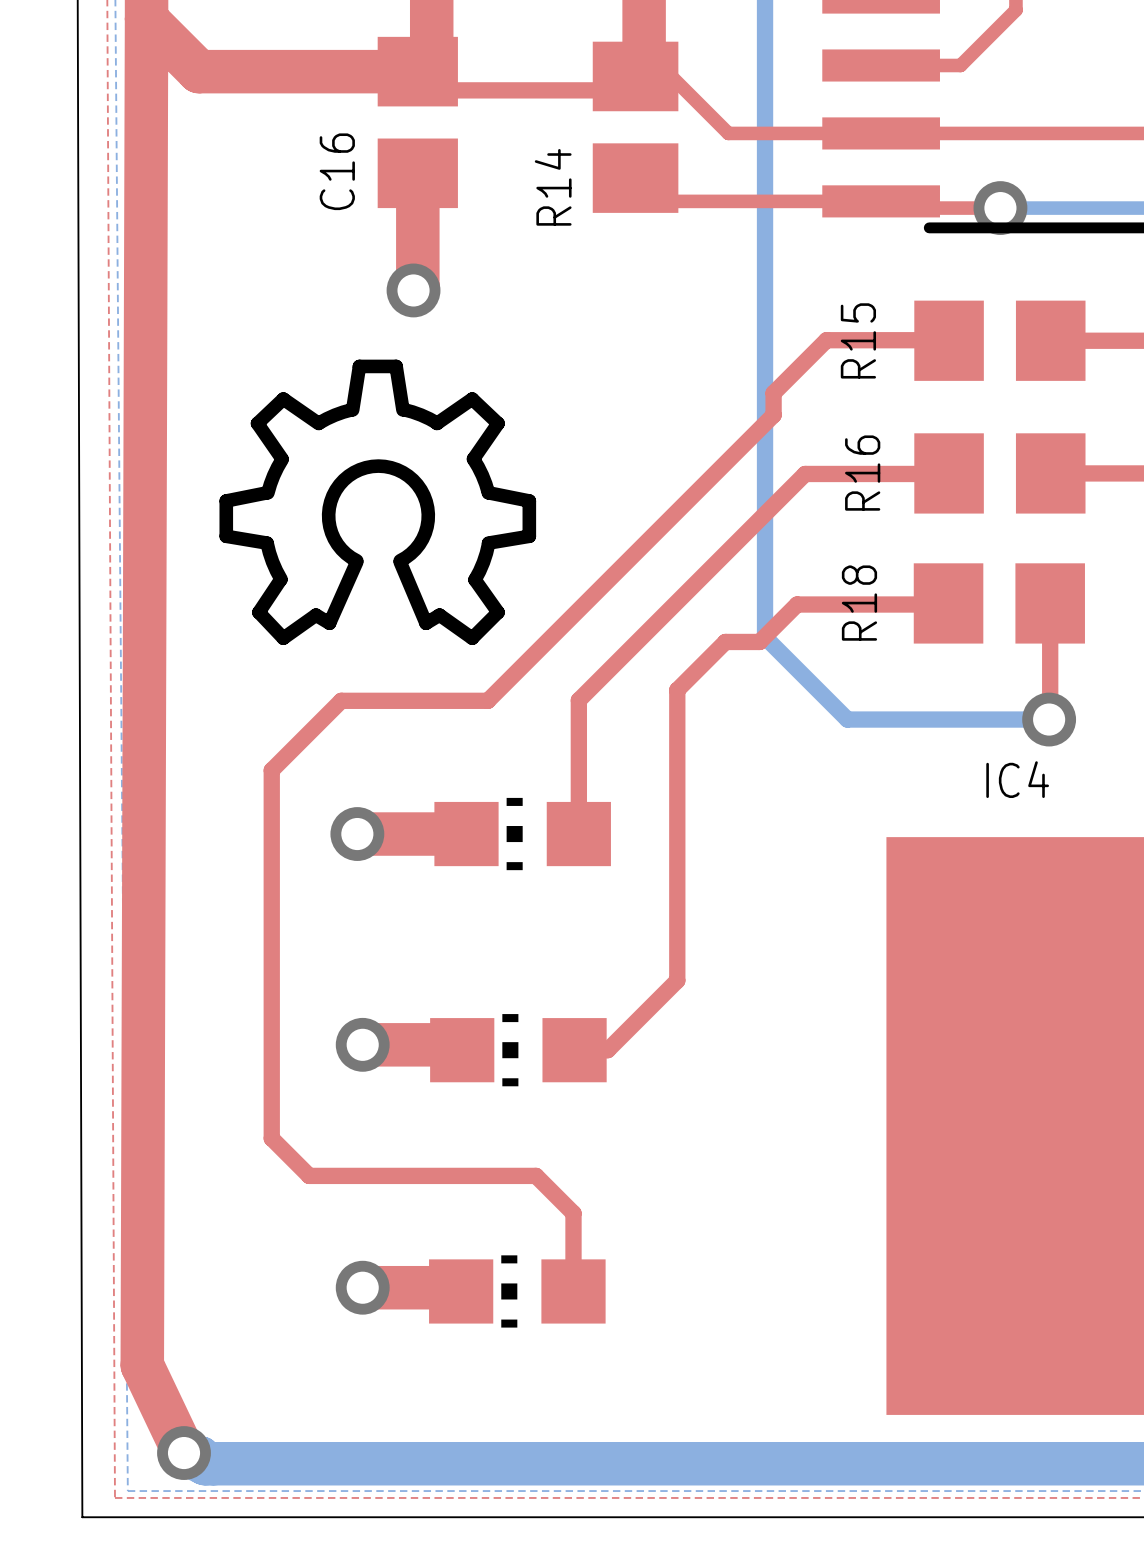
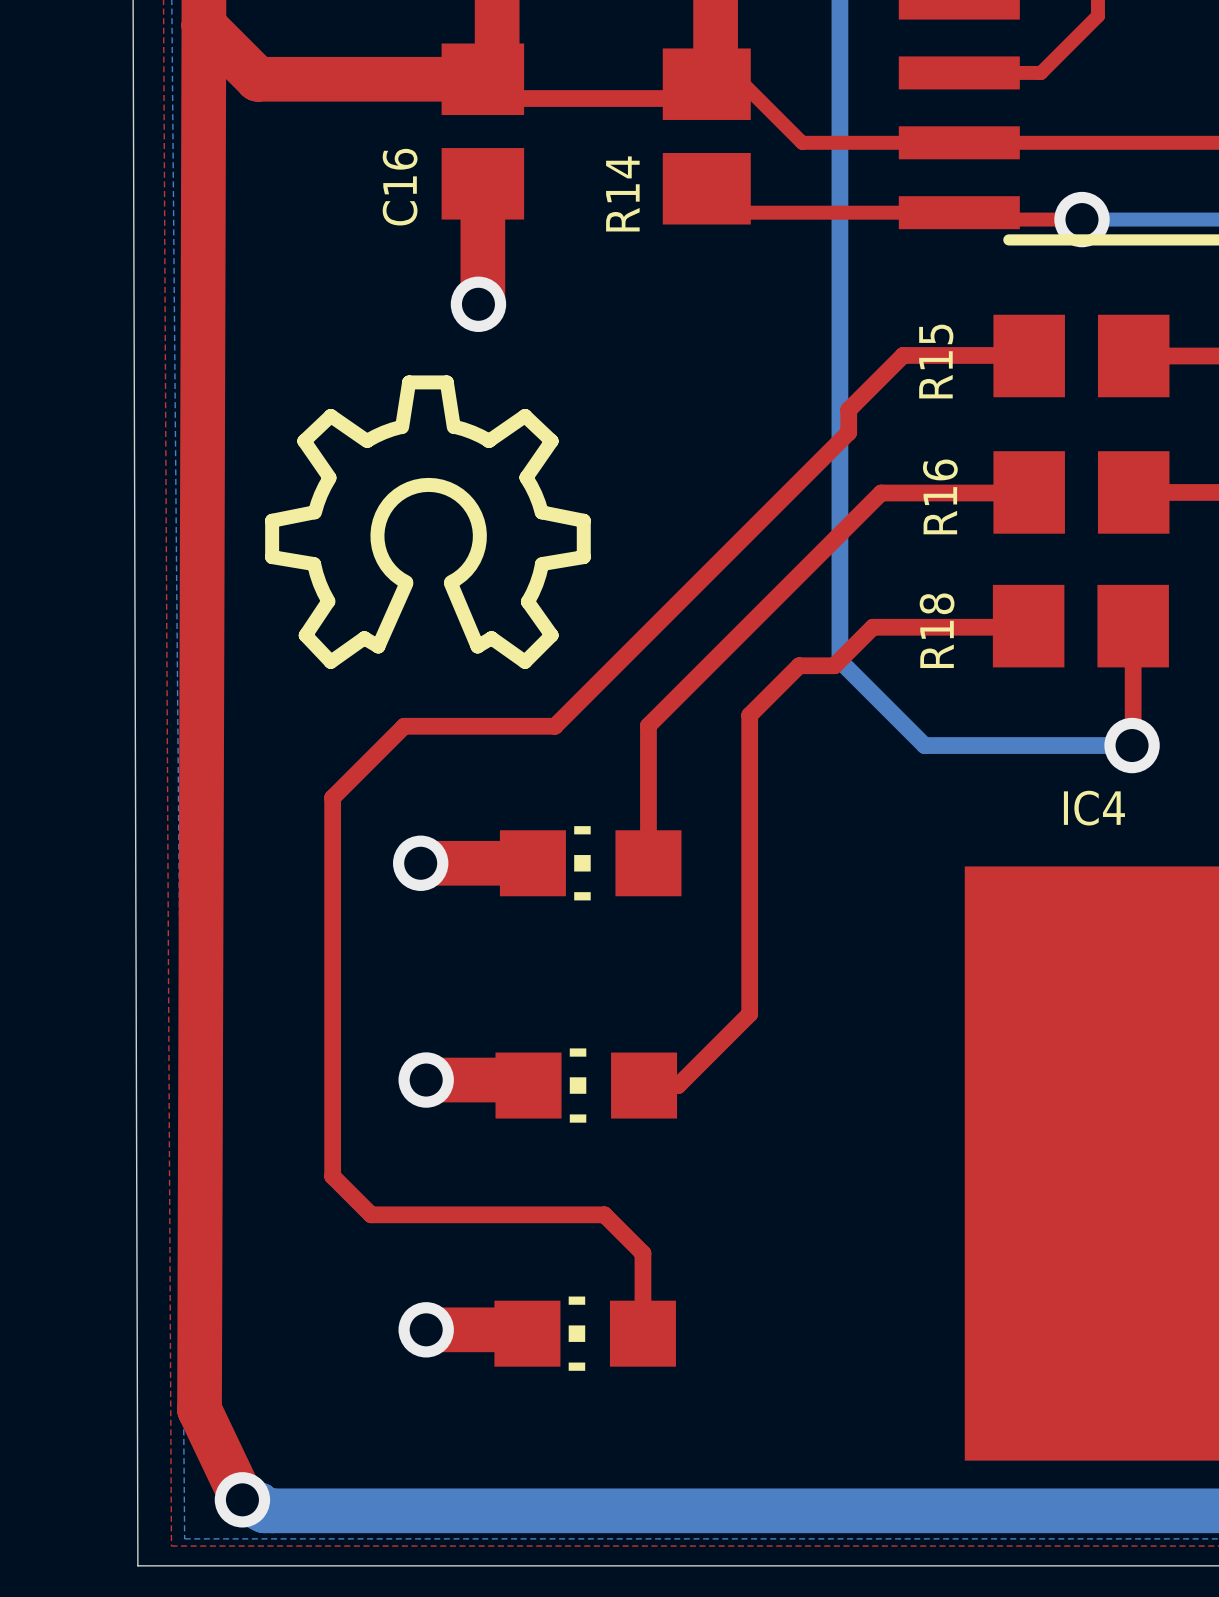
drawing position: (377, 502) -> (427, 522)

